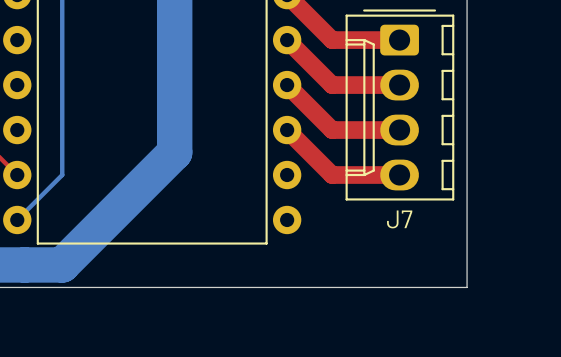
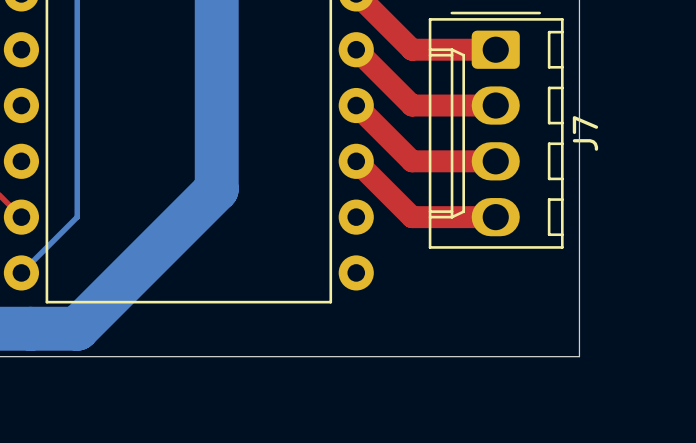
J7 name rotation: 0° (399, 219) -> 90° counterclockwise (585, 133)
J7 name position: J7 (399, 219) -> J7 (585, 133)

